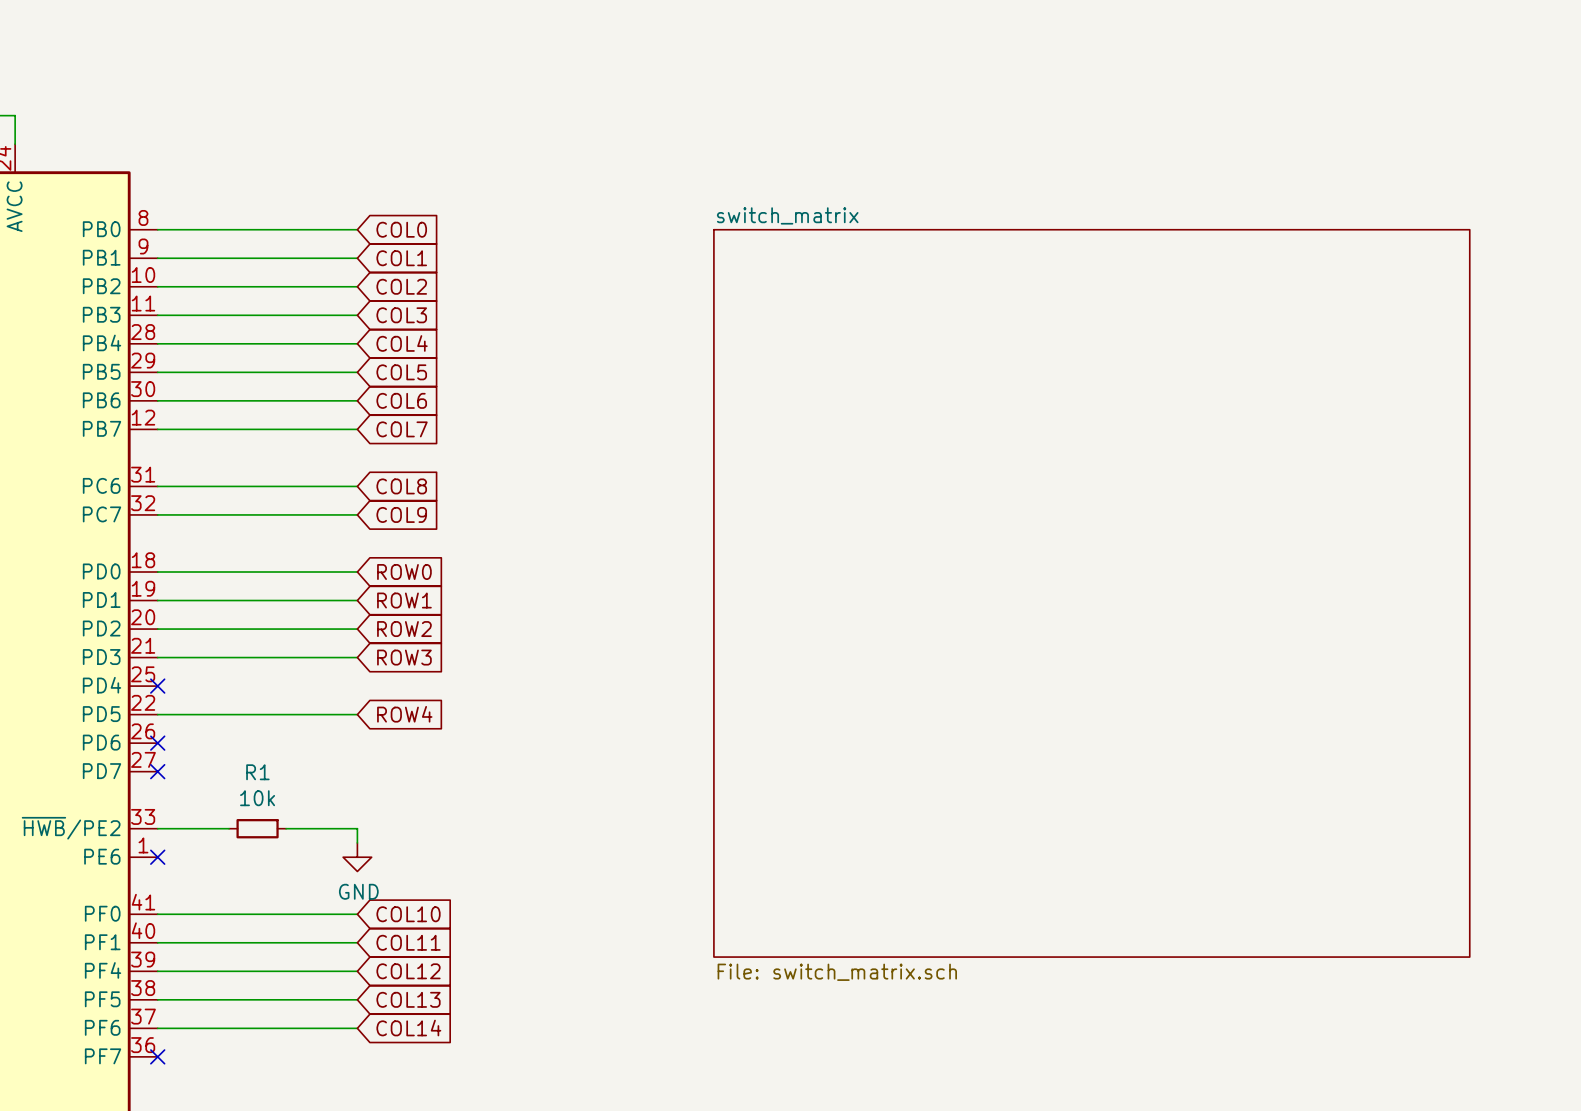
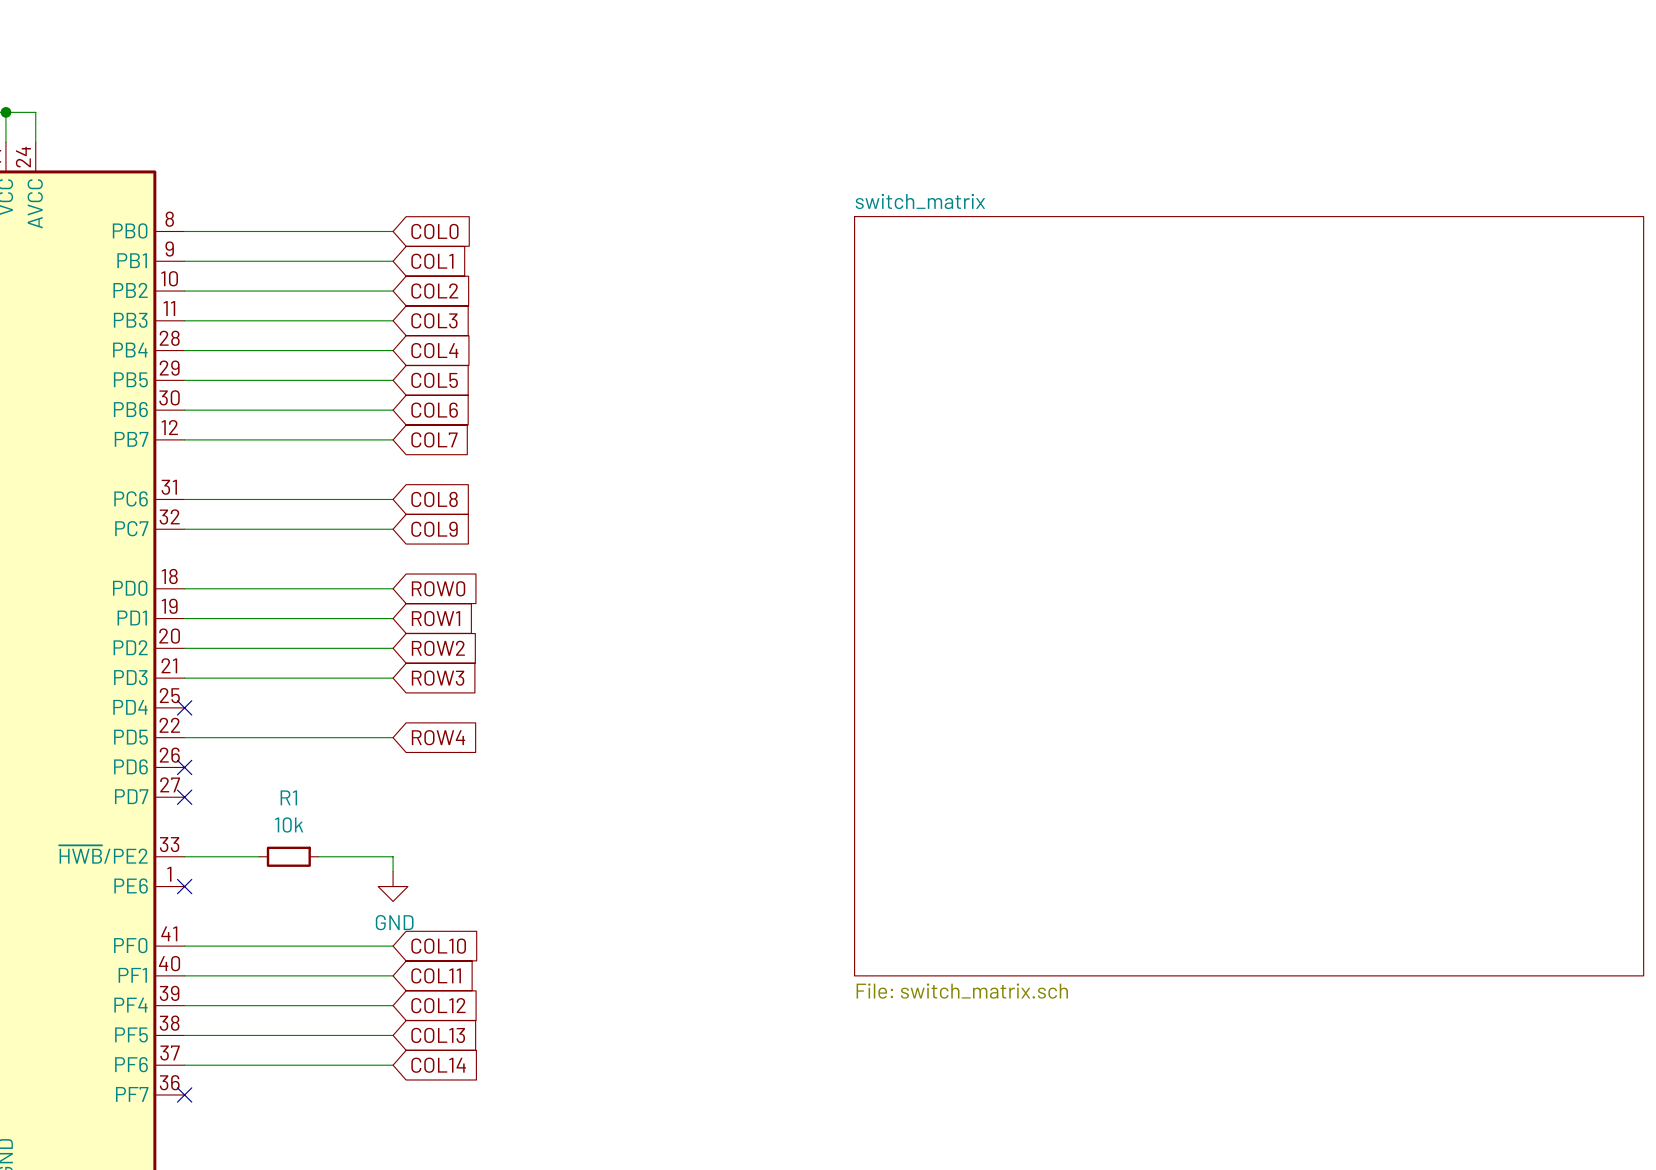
sheet switch_matrix position: (1091, 593) -> (1249, 596)

